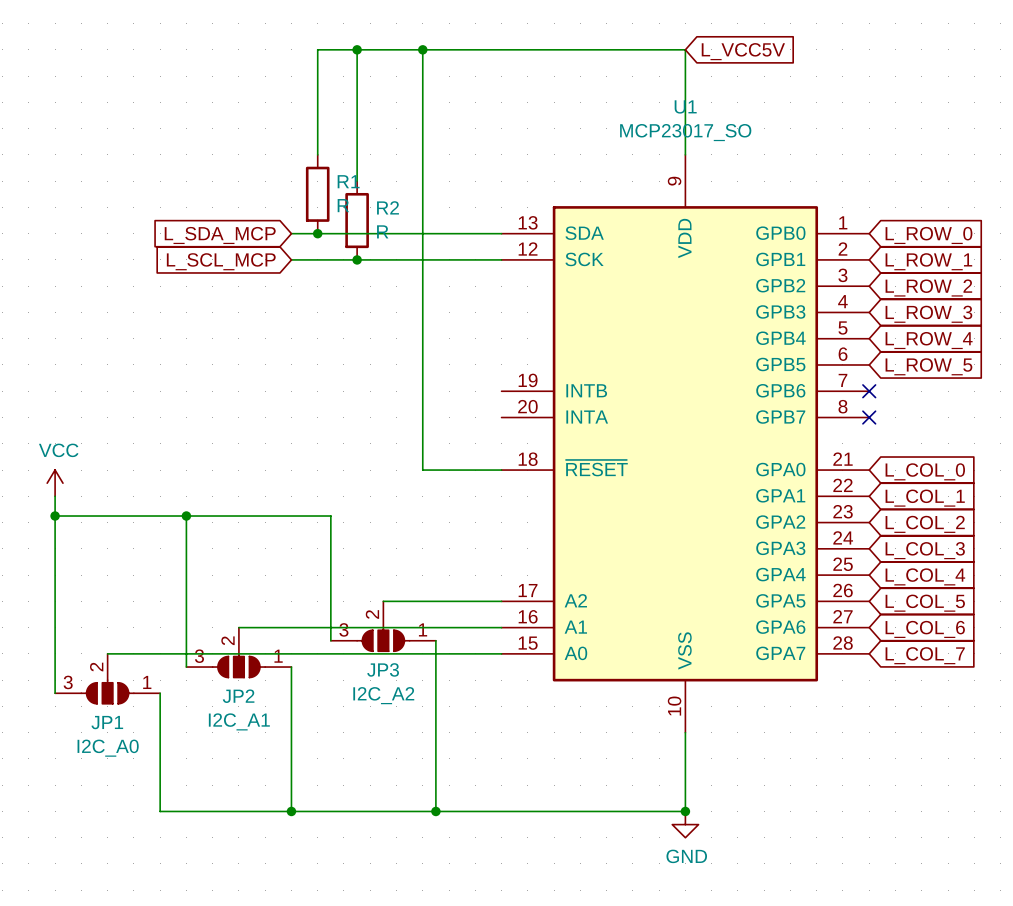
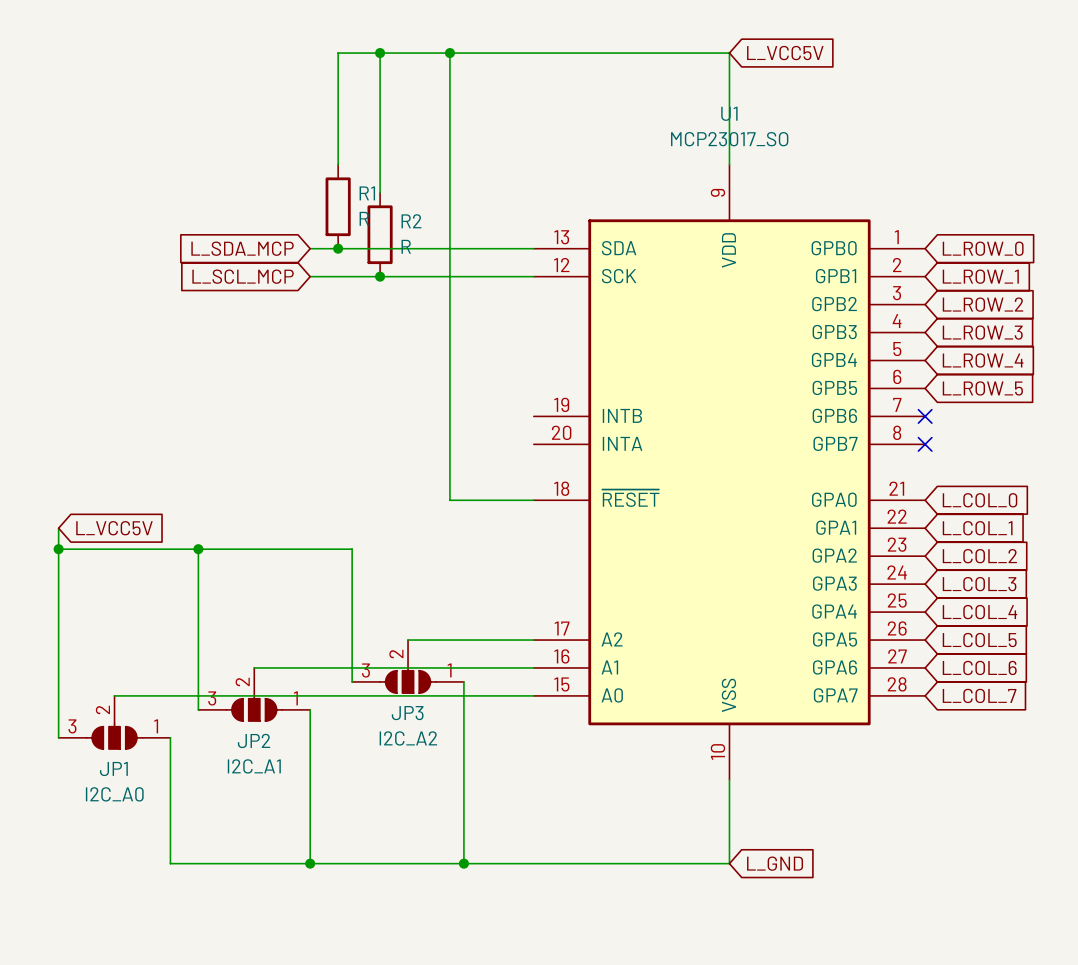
power symbol: VCC (55, 483) -> none
global label: none -> L_VCC5V (114, 528)
junction: (685, 811) -> none
global label: none -> L_GND (775, 863)
power symbol: GND (685, 824) -> none

